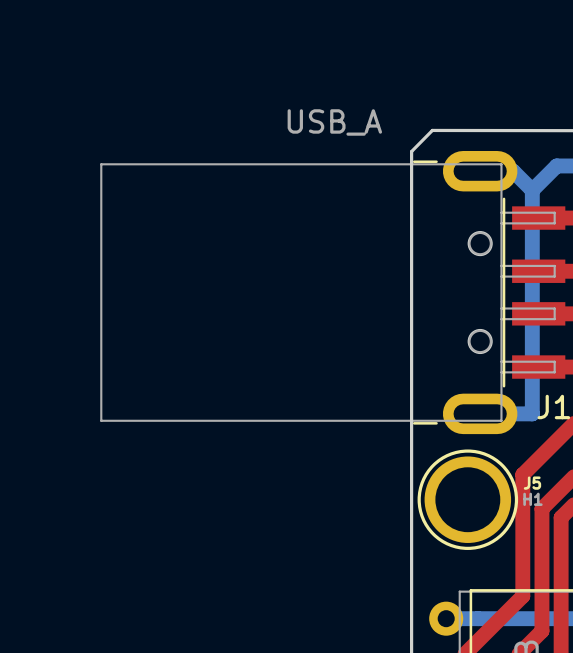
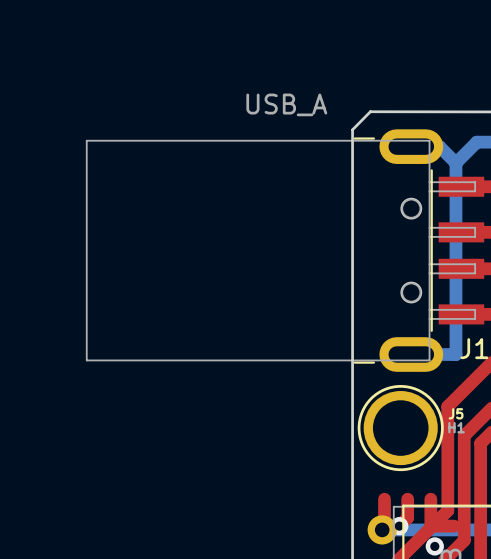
top track: none -> (384, 499) (384, 526) (399, 526) (407, 517) (407, 499)
top track: none -> (430, 499) (430, 526) (453, 526)
via: none -> (399, 526)
via: none -> (434, 546)

